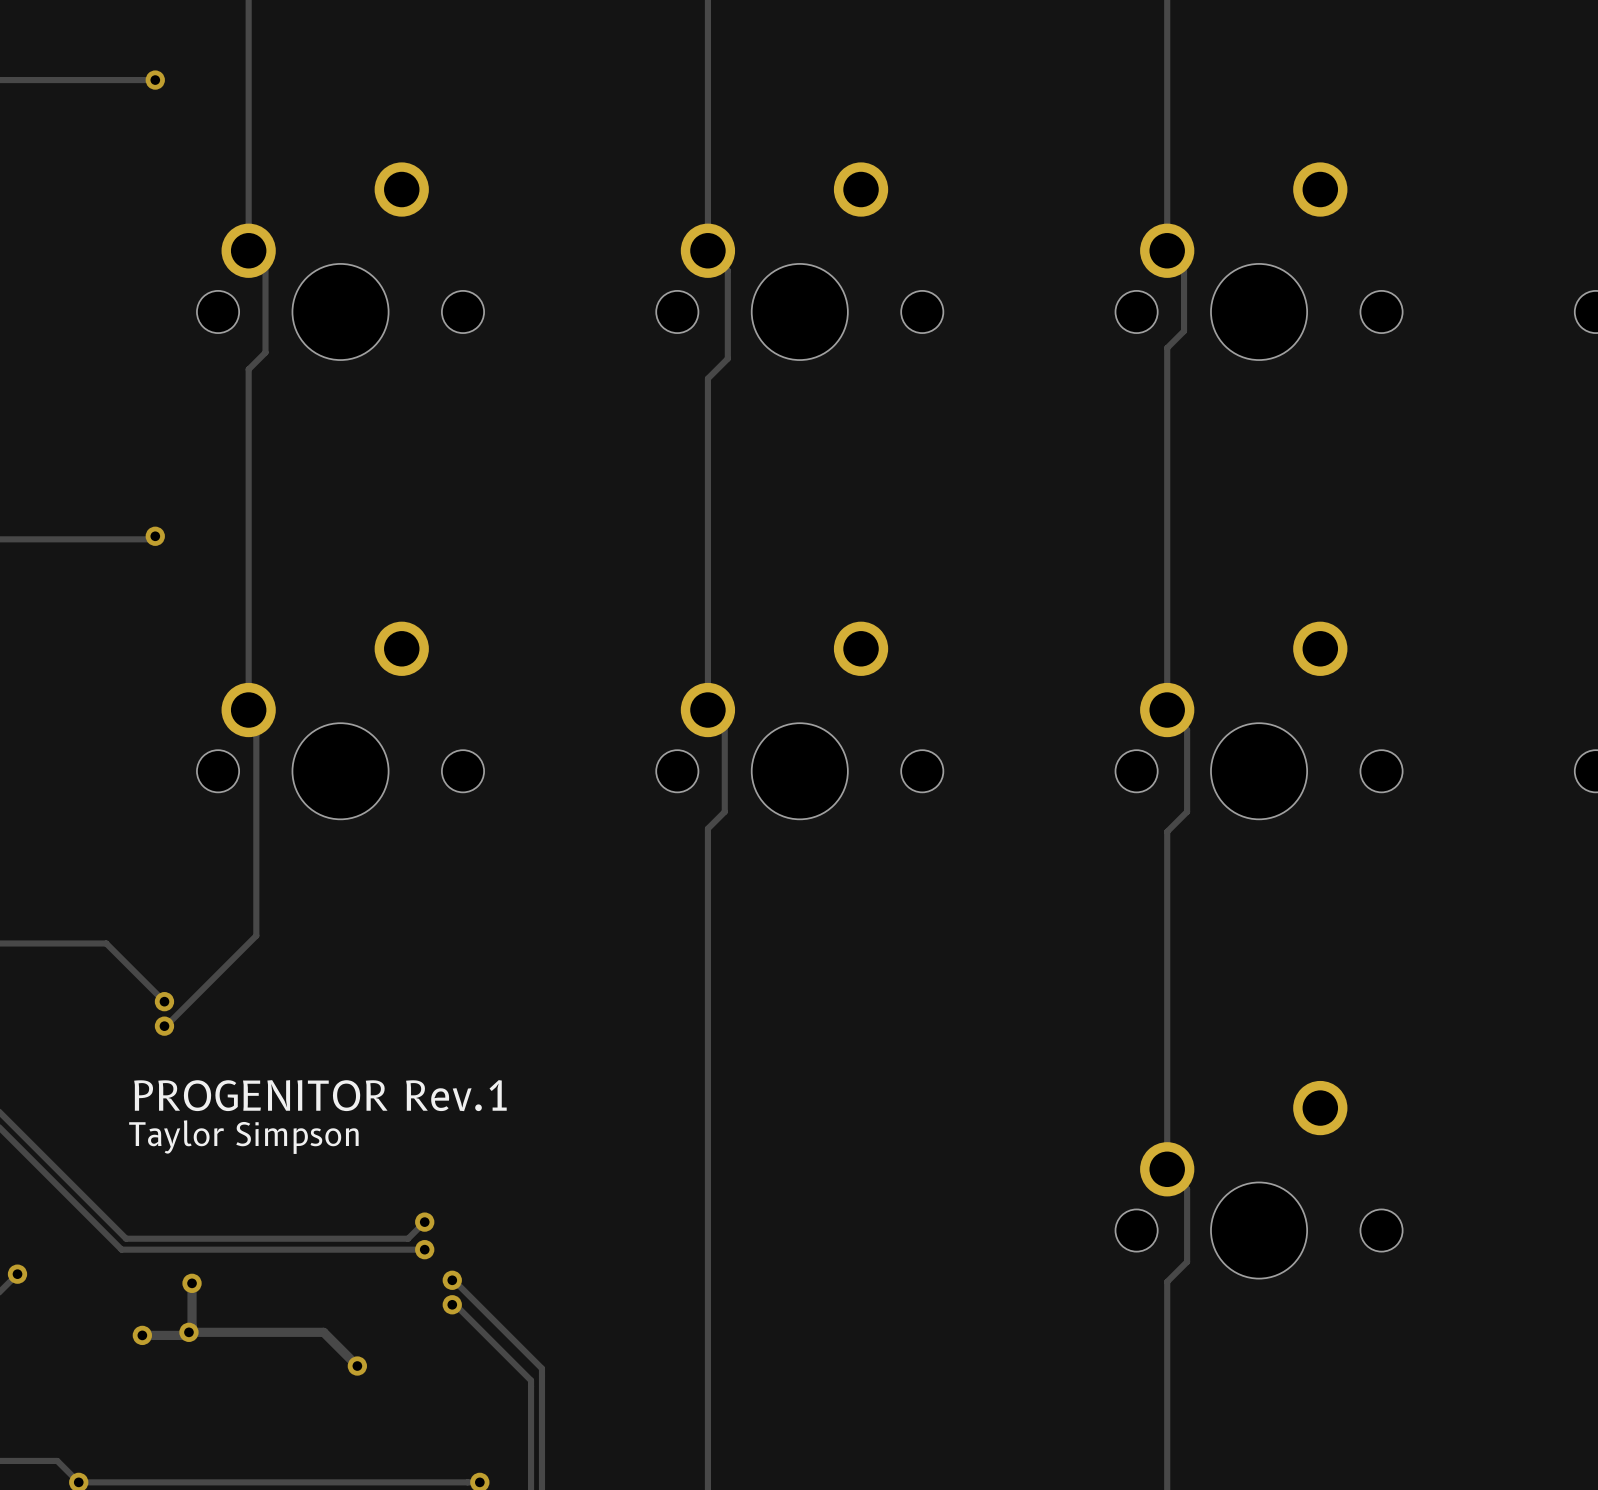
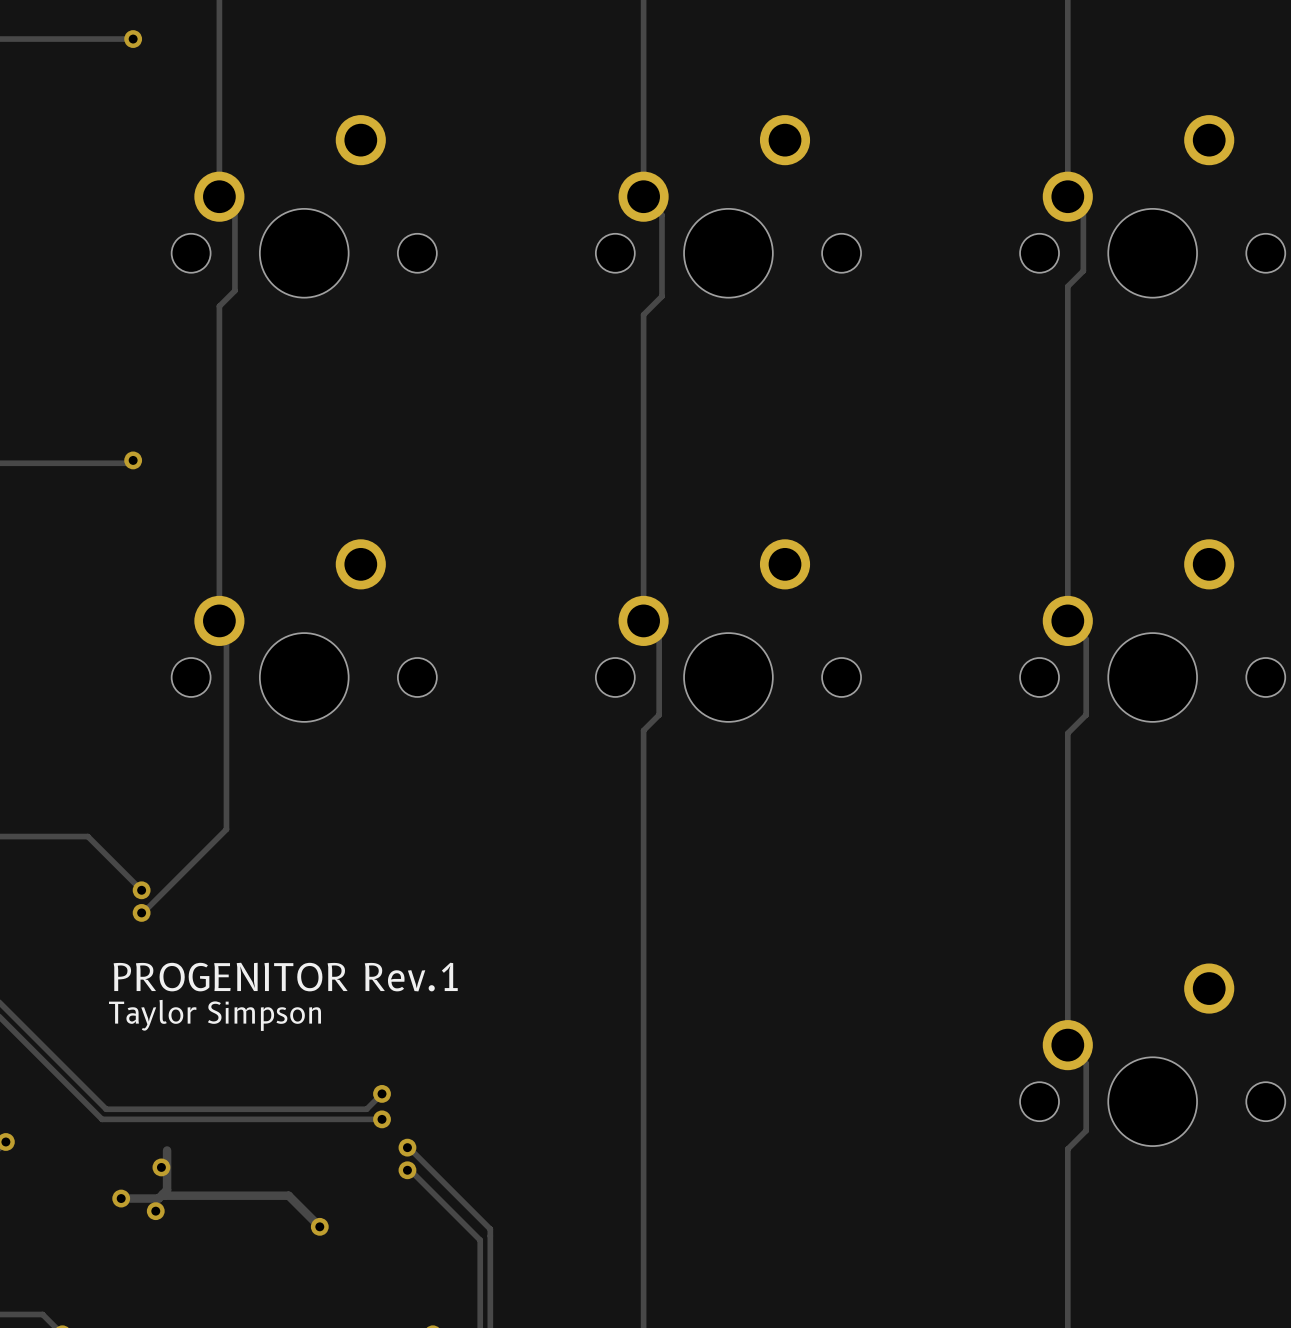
via position: (192, 1283) -> (161, 1167)
via position: (188, 1332) -> (155, 1211)

